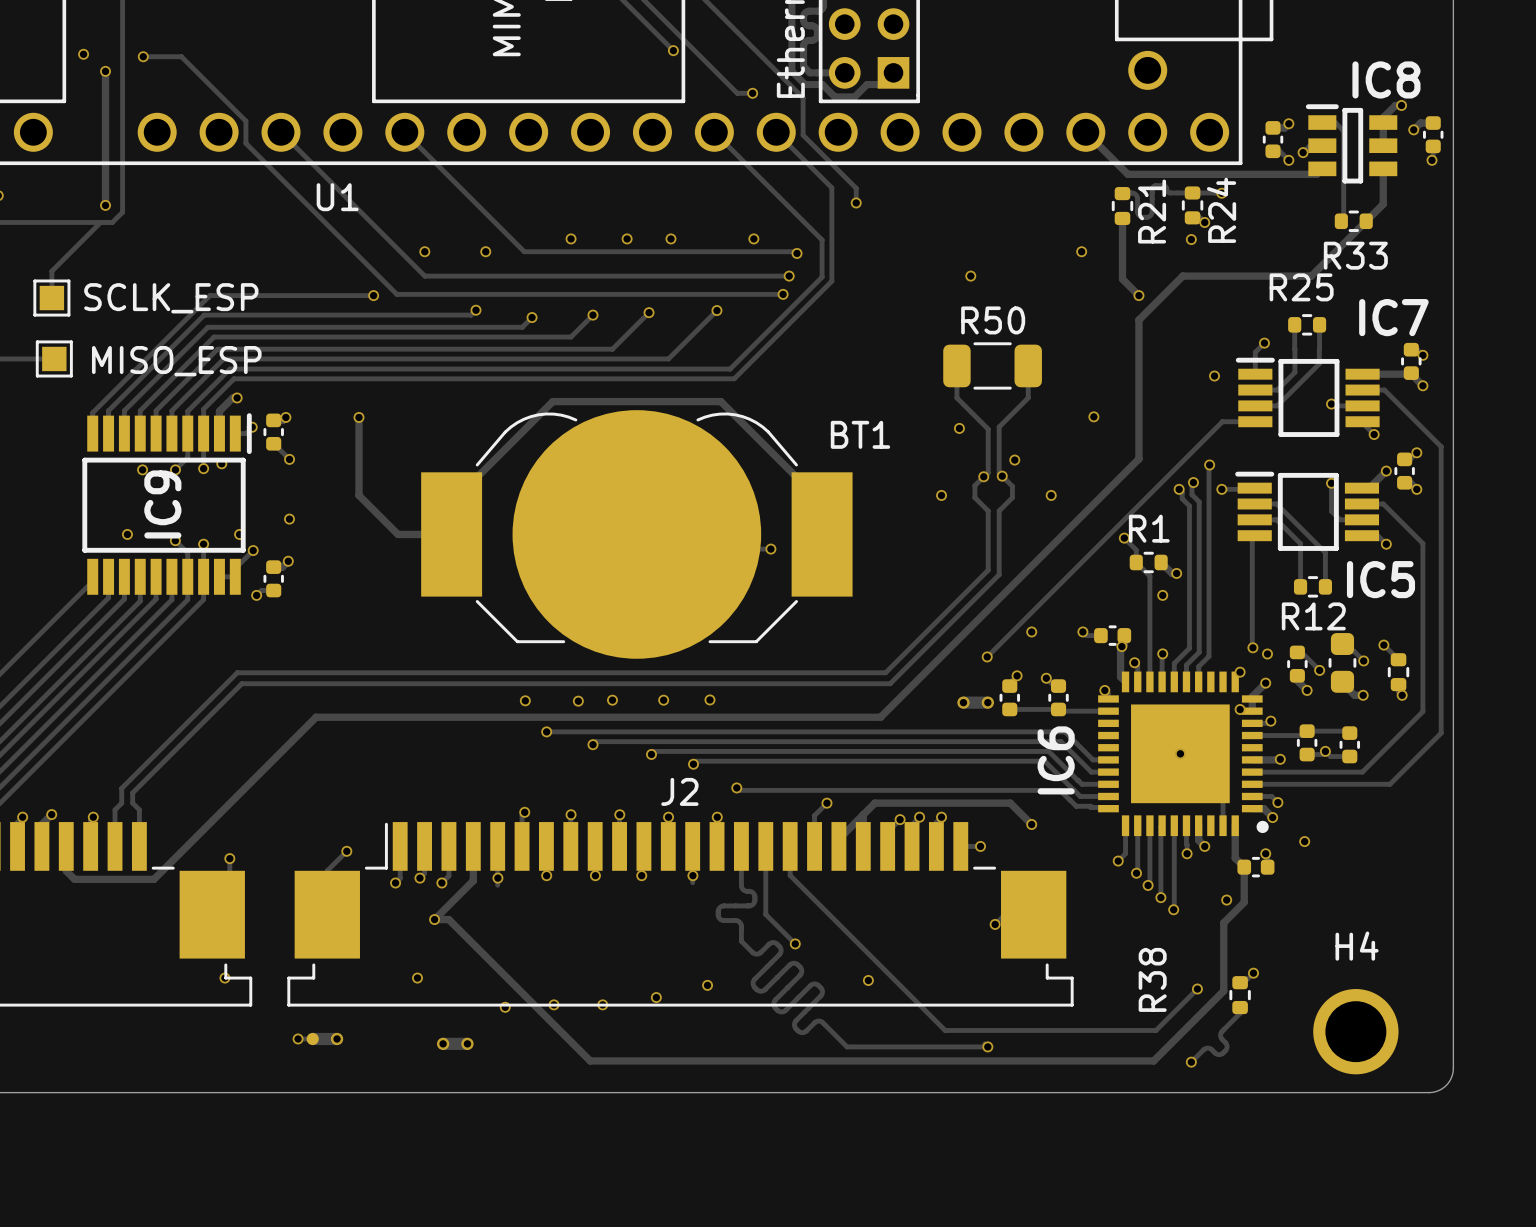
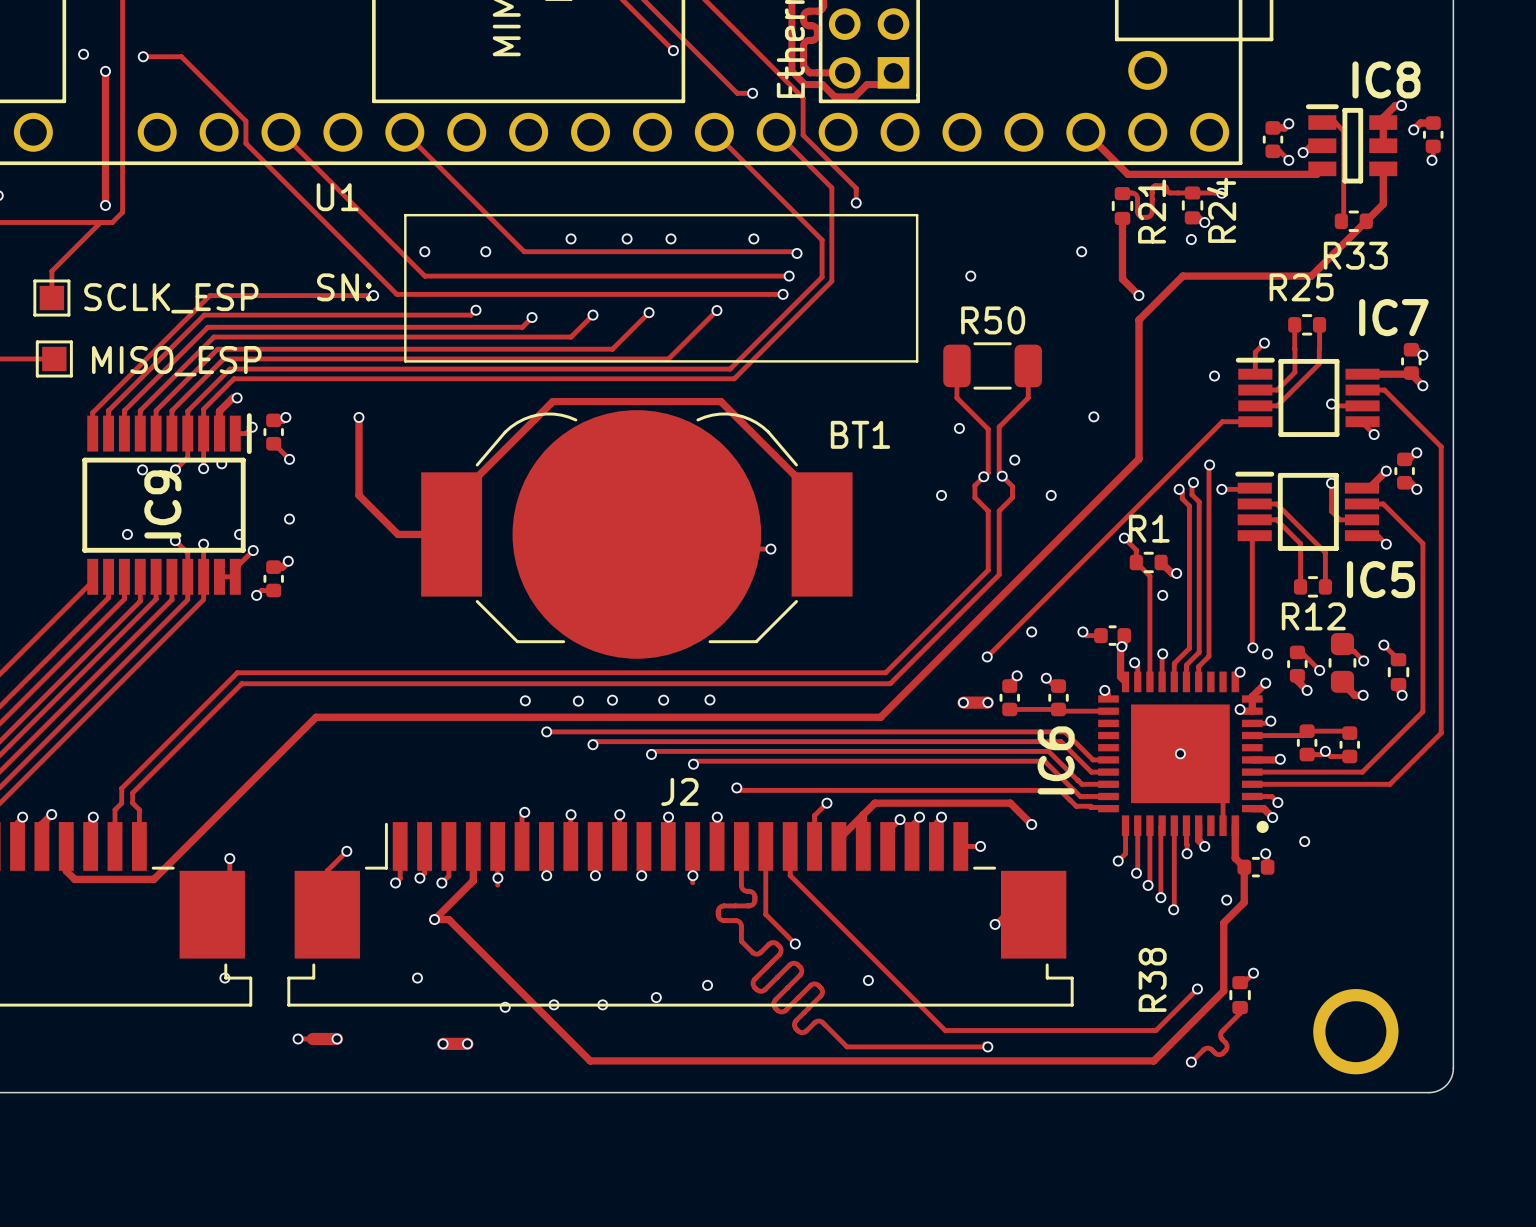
line: none -> (405, 215) (917, 215) (917, 361) (405, 361) (405, 215)
text: none -> SN: (344, 287)
H4 name: H4 (1357, 946) -> none

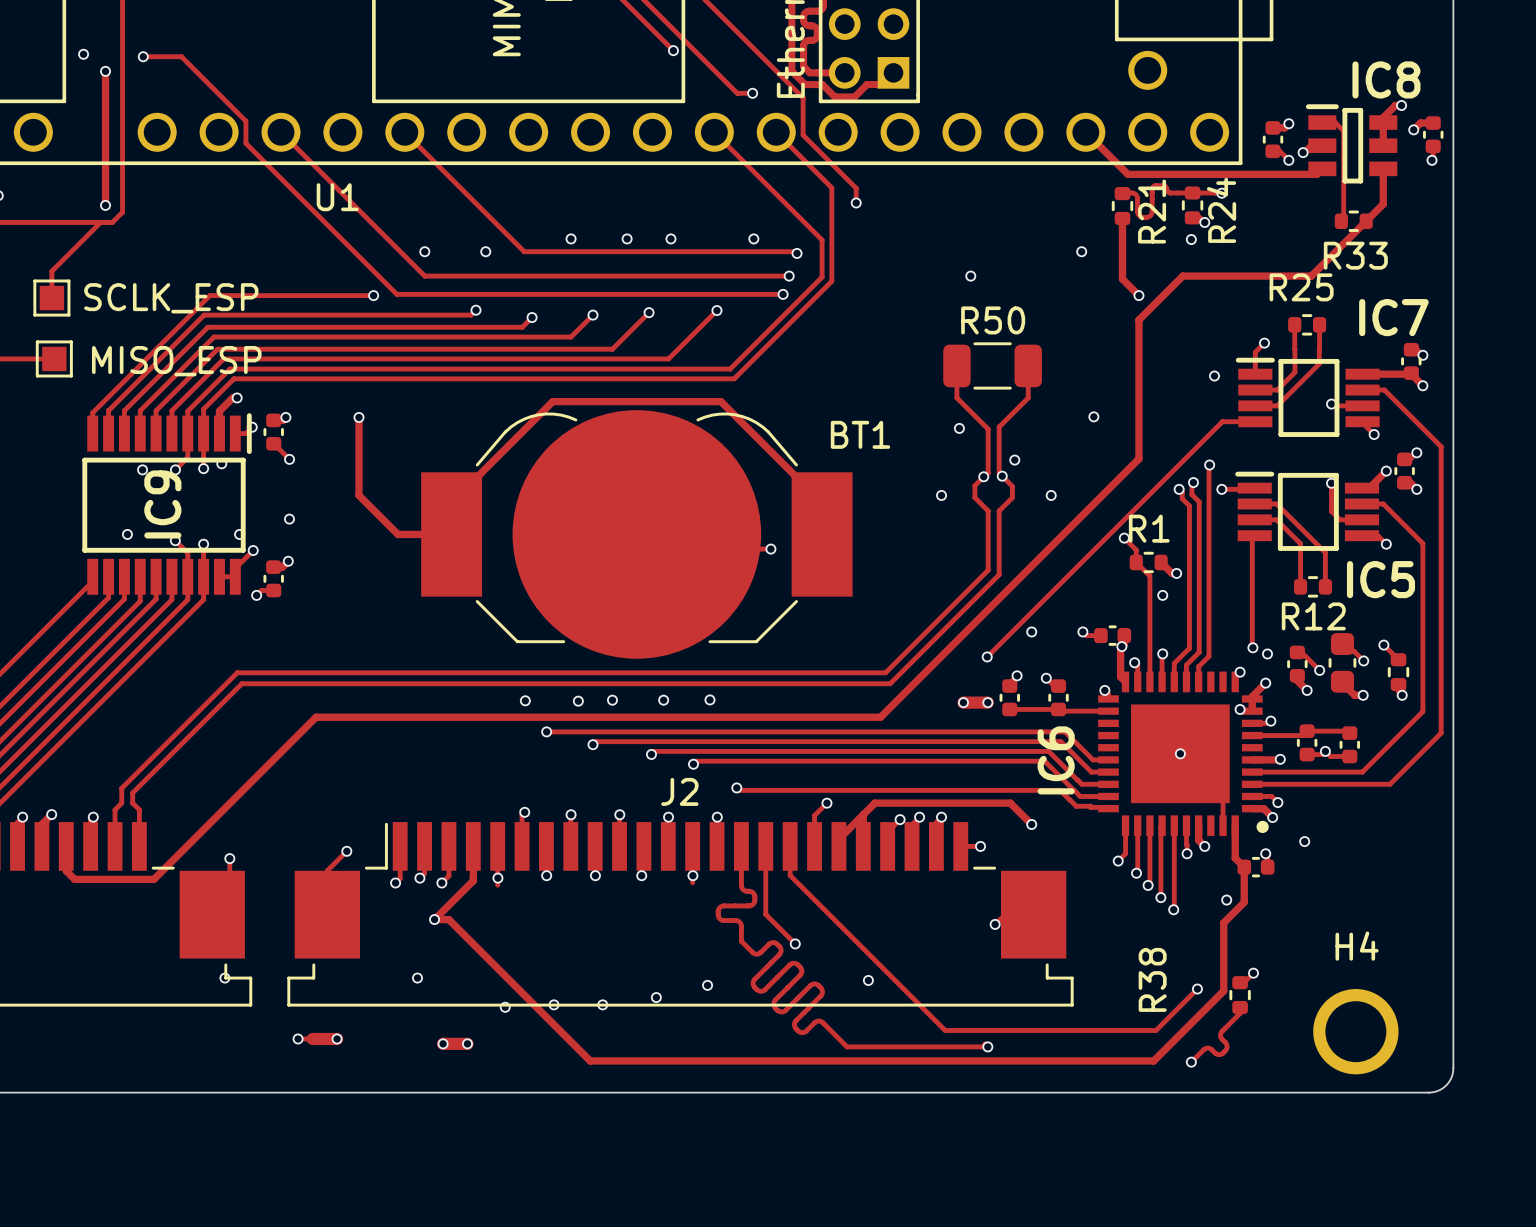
line: (405, 215) (917, 215) (917, 361) (405, 361) (405, 215) -> none
text: SN: (344, 287) -> none
H4 name: none -> H4 (1357, 946)

